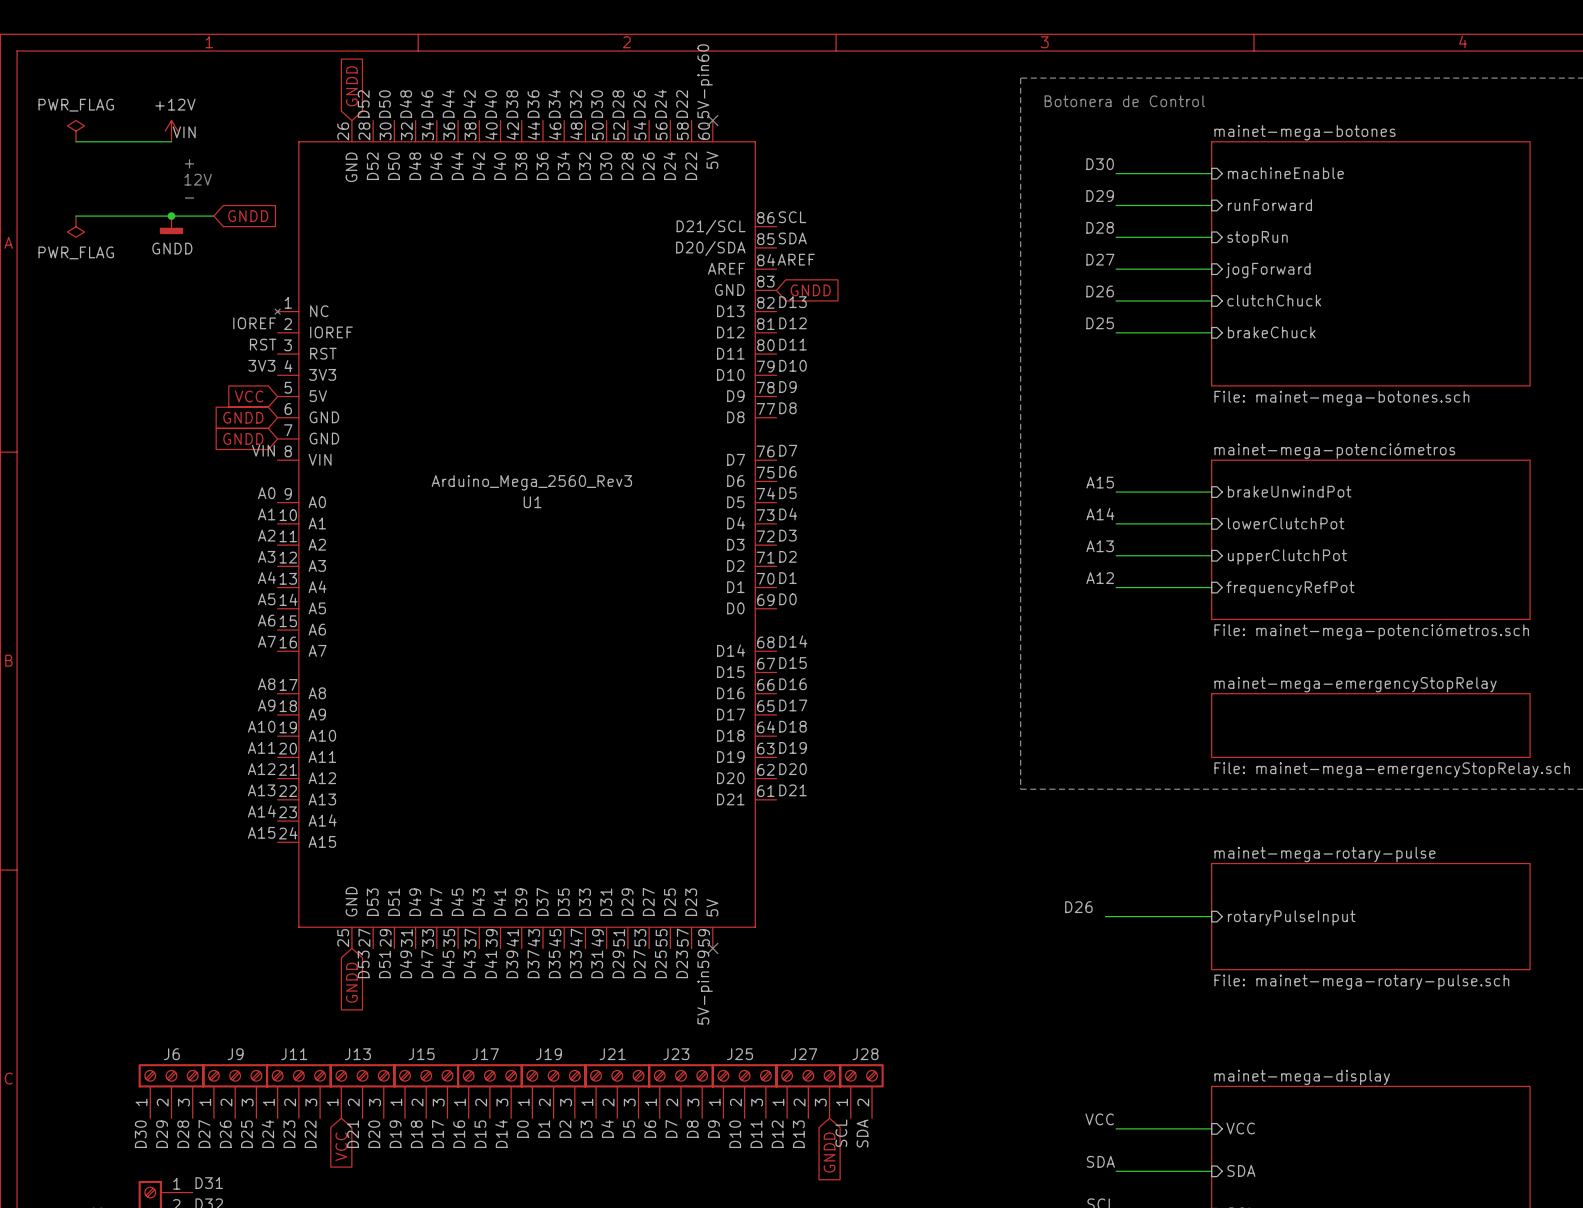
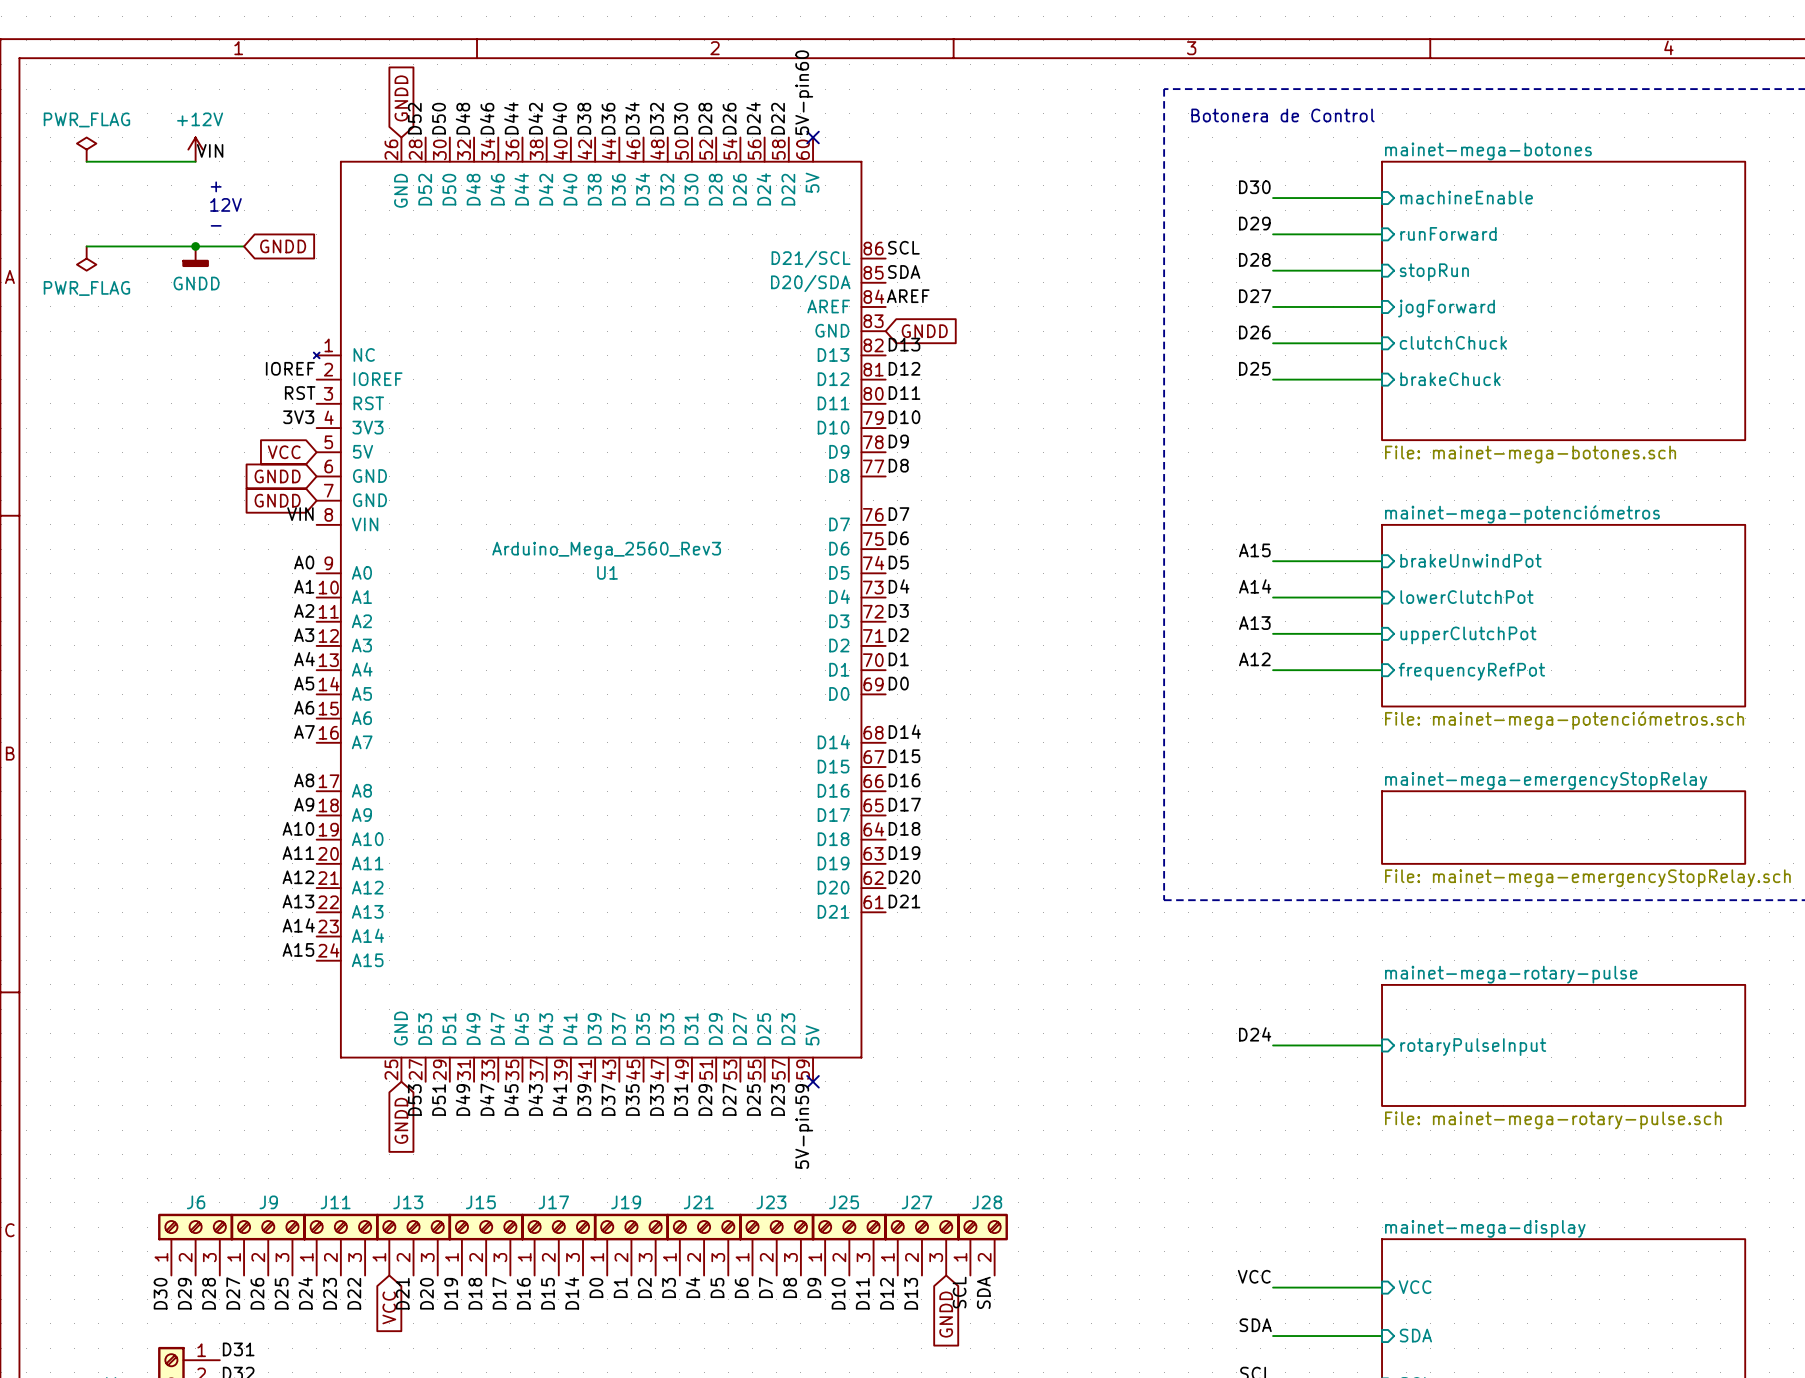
label: D26 (1078, 907) -> D24 (1255, 1034)
wire: (1105, 916) (1116, 916) -> none

